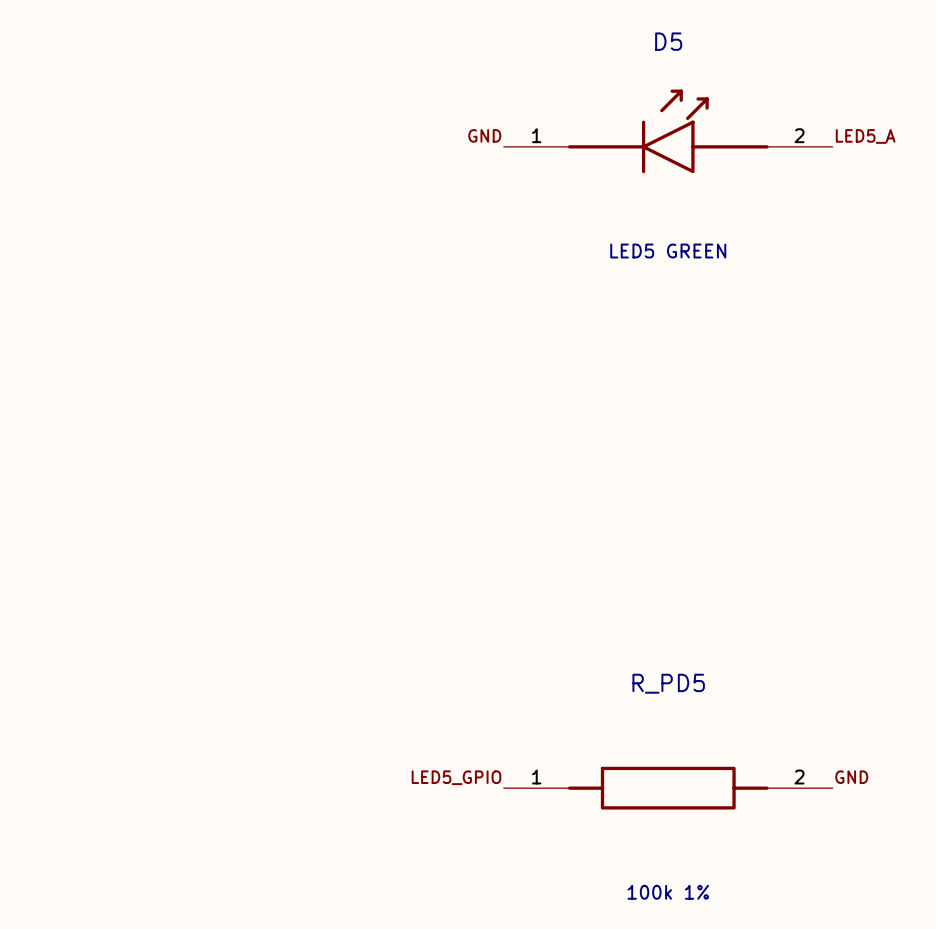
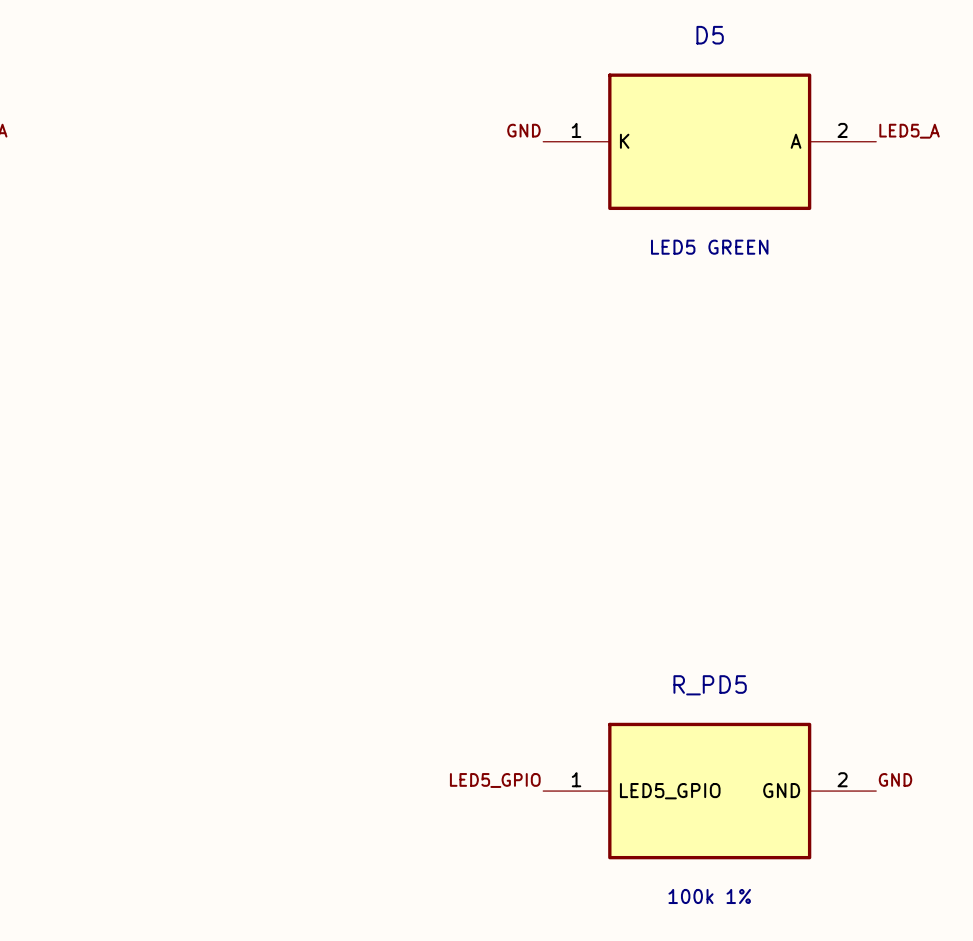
D5 symbol: [503, 89, 833, 174] -> [543, 73, 877, 211]
R_PD5 symbol: [503, 766, 833, 810] -> [543, 722, 877, 860]

